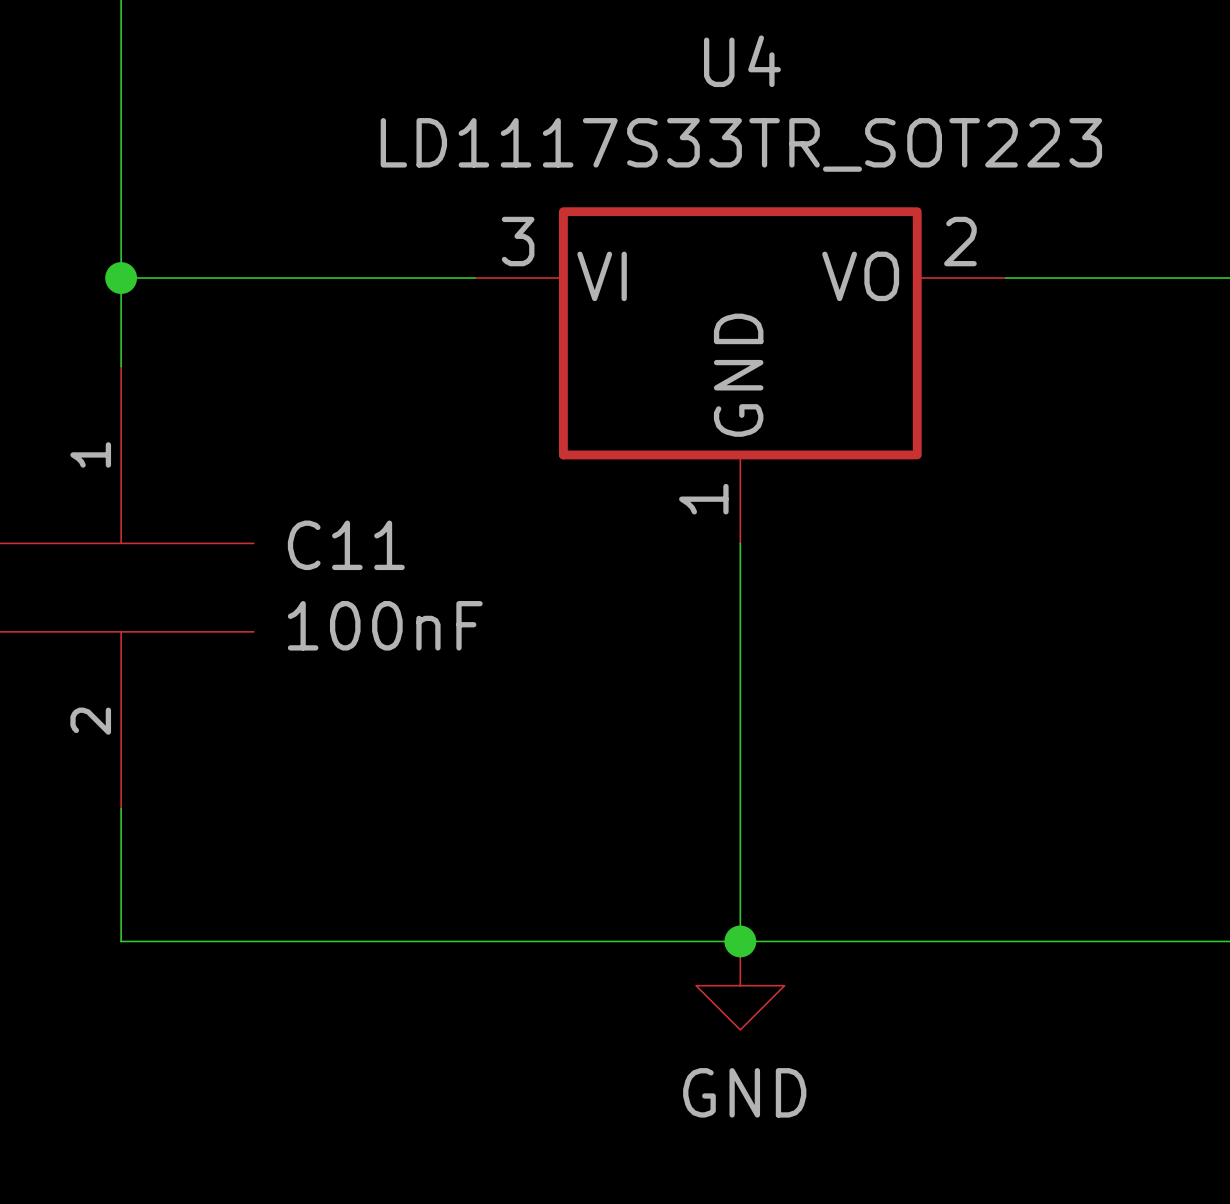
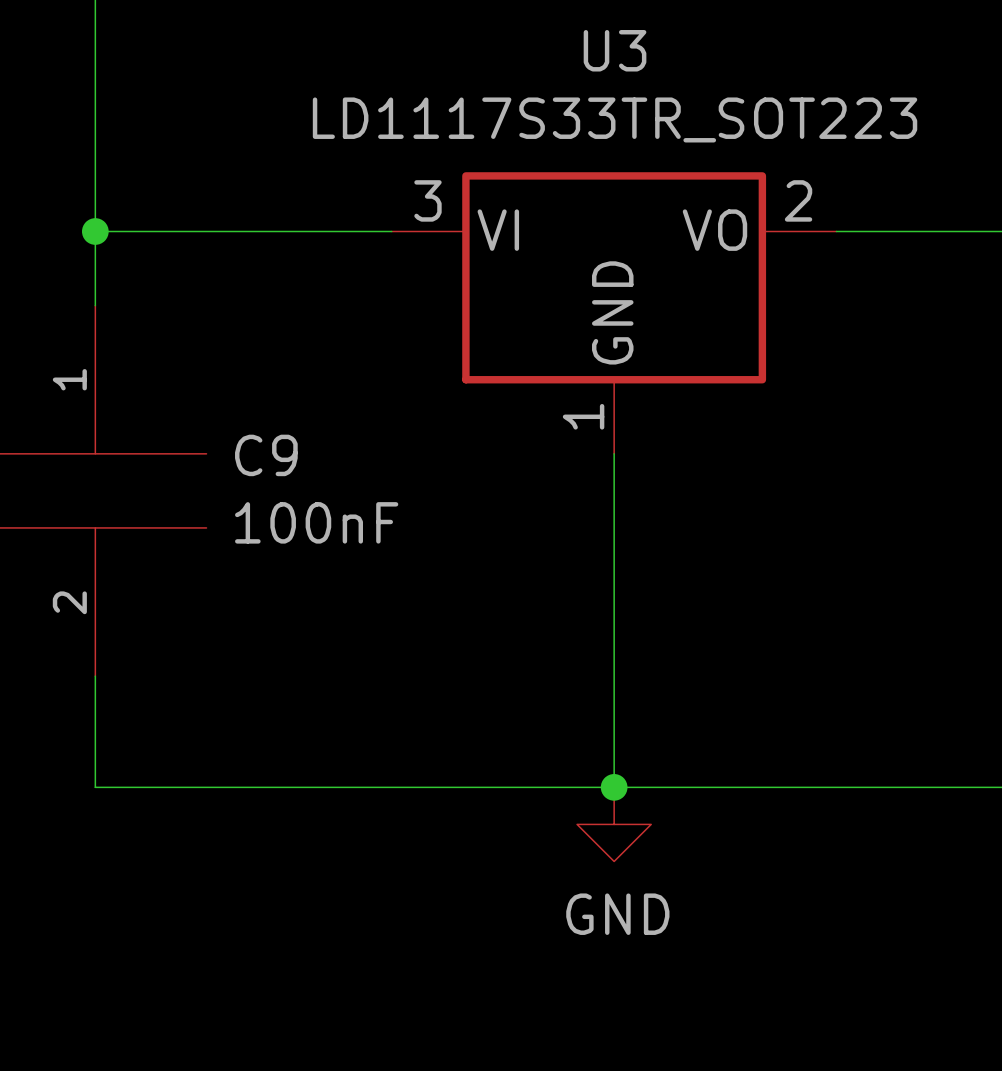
U4 name: U4 (742, 61) -> U3 (615, 50)
C11 name: C11 (346, 545) -> C9 (266, 455)

